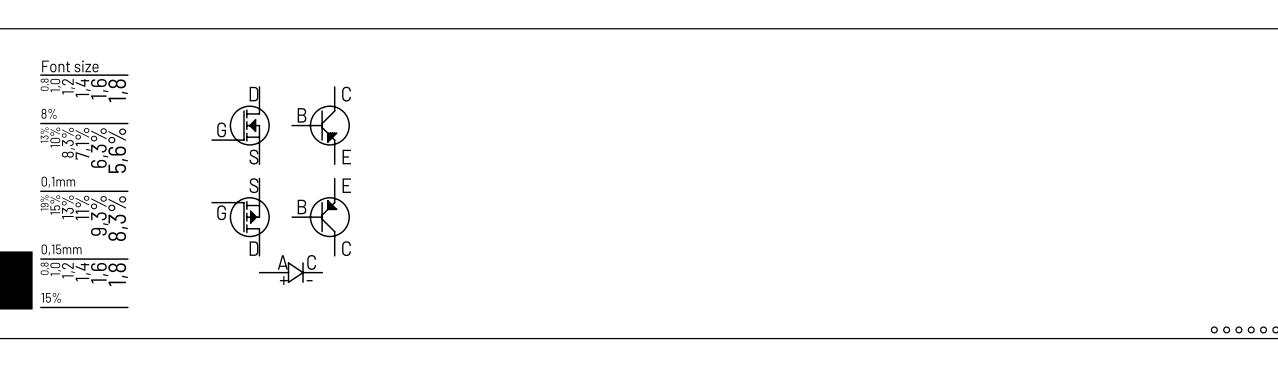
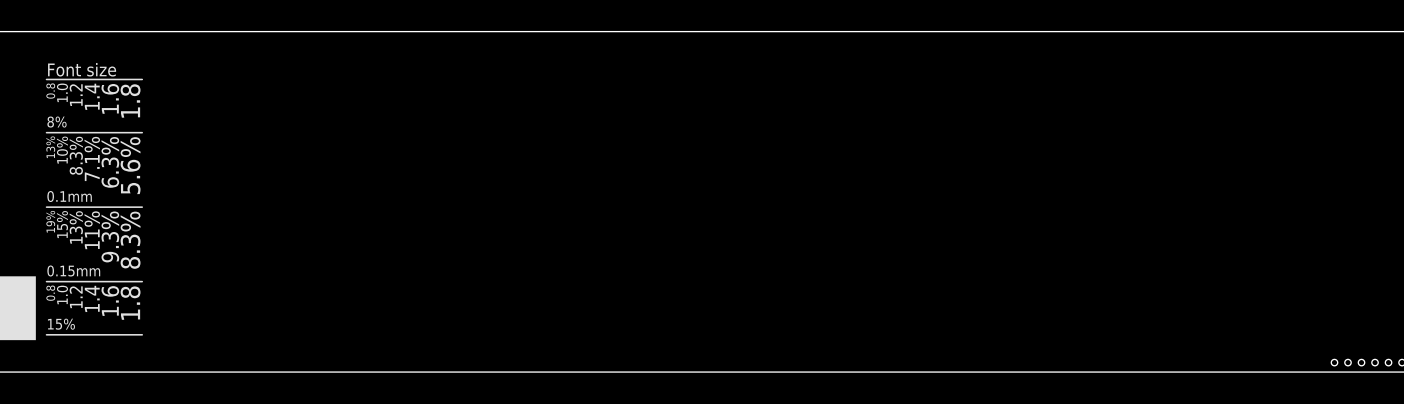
drawing shape: [40, 60, 129, 309] -> [45, 62, 144, 336]
drawing: [211, 86, 350, 284] -> none

